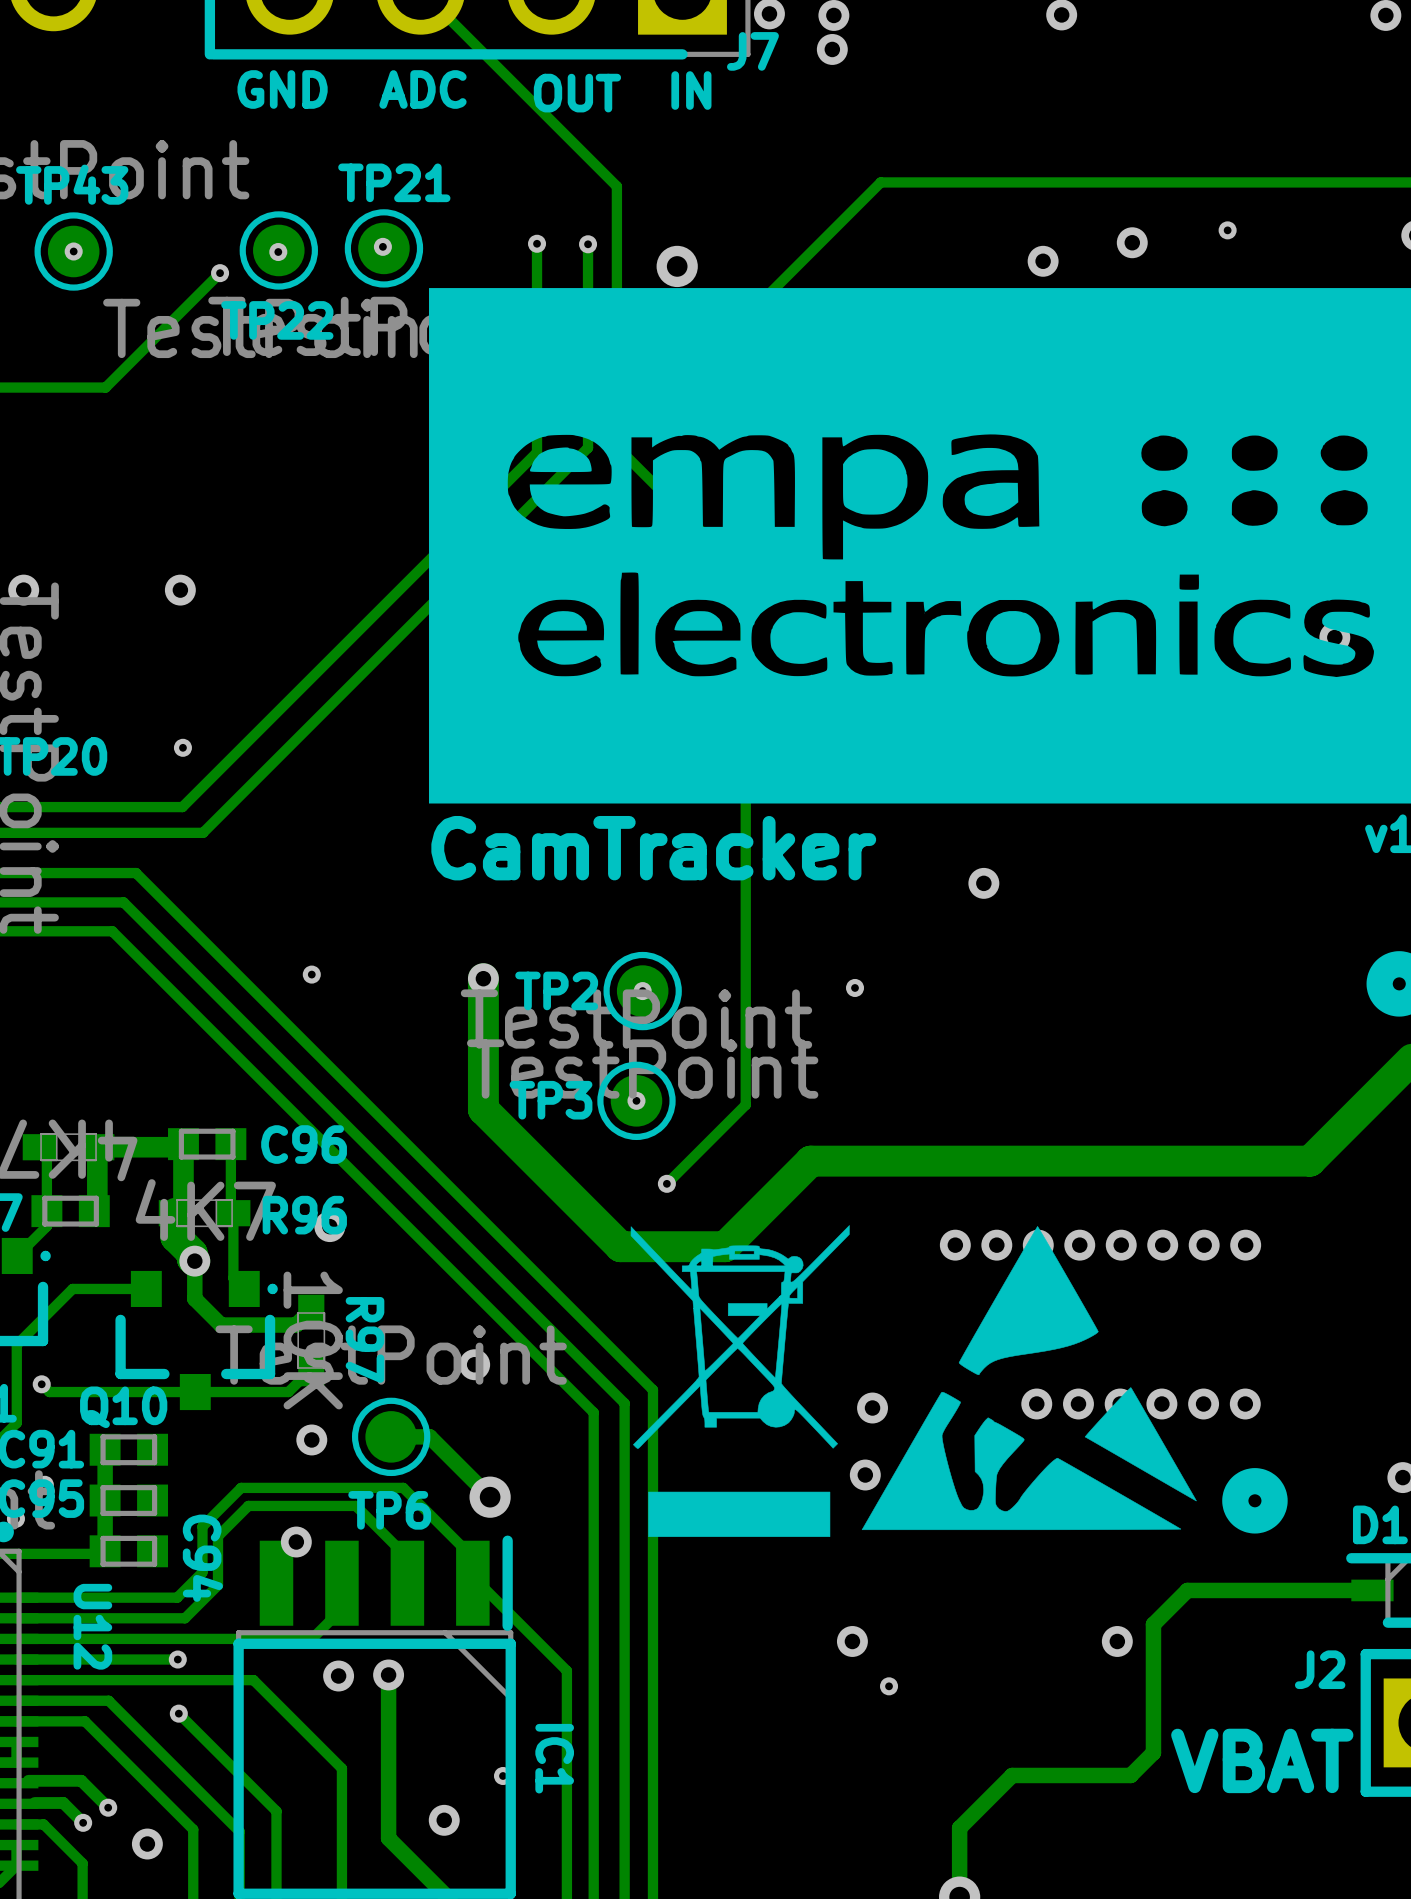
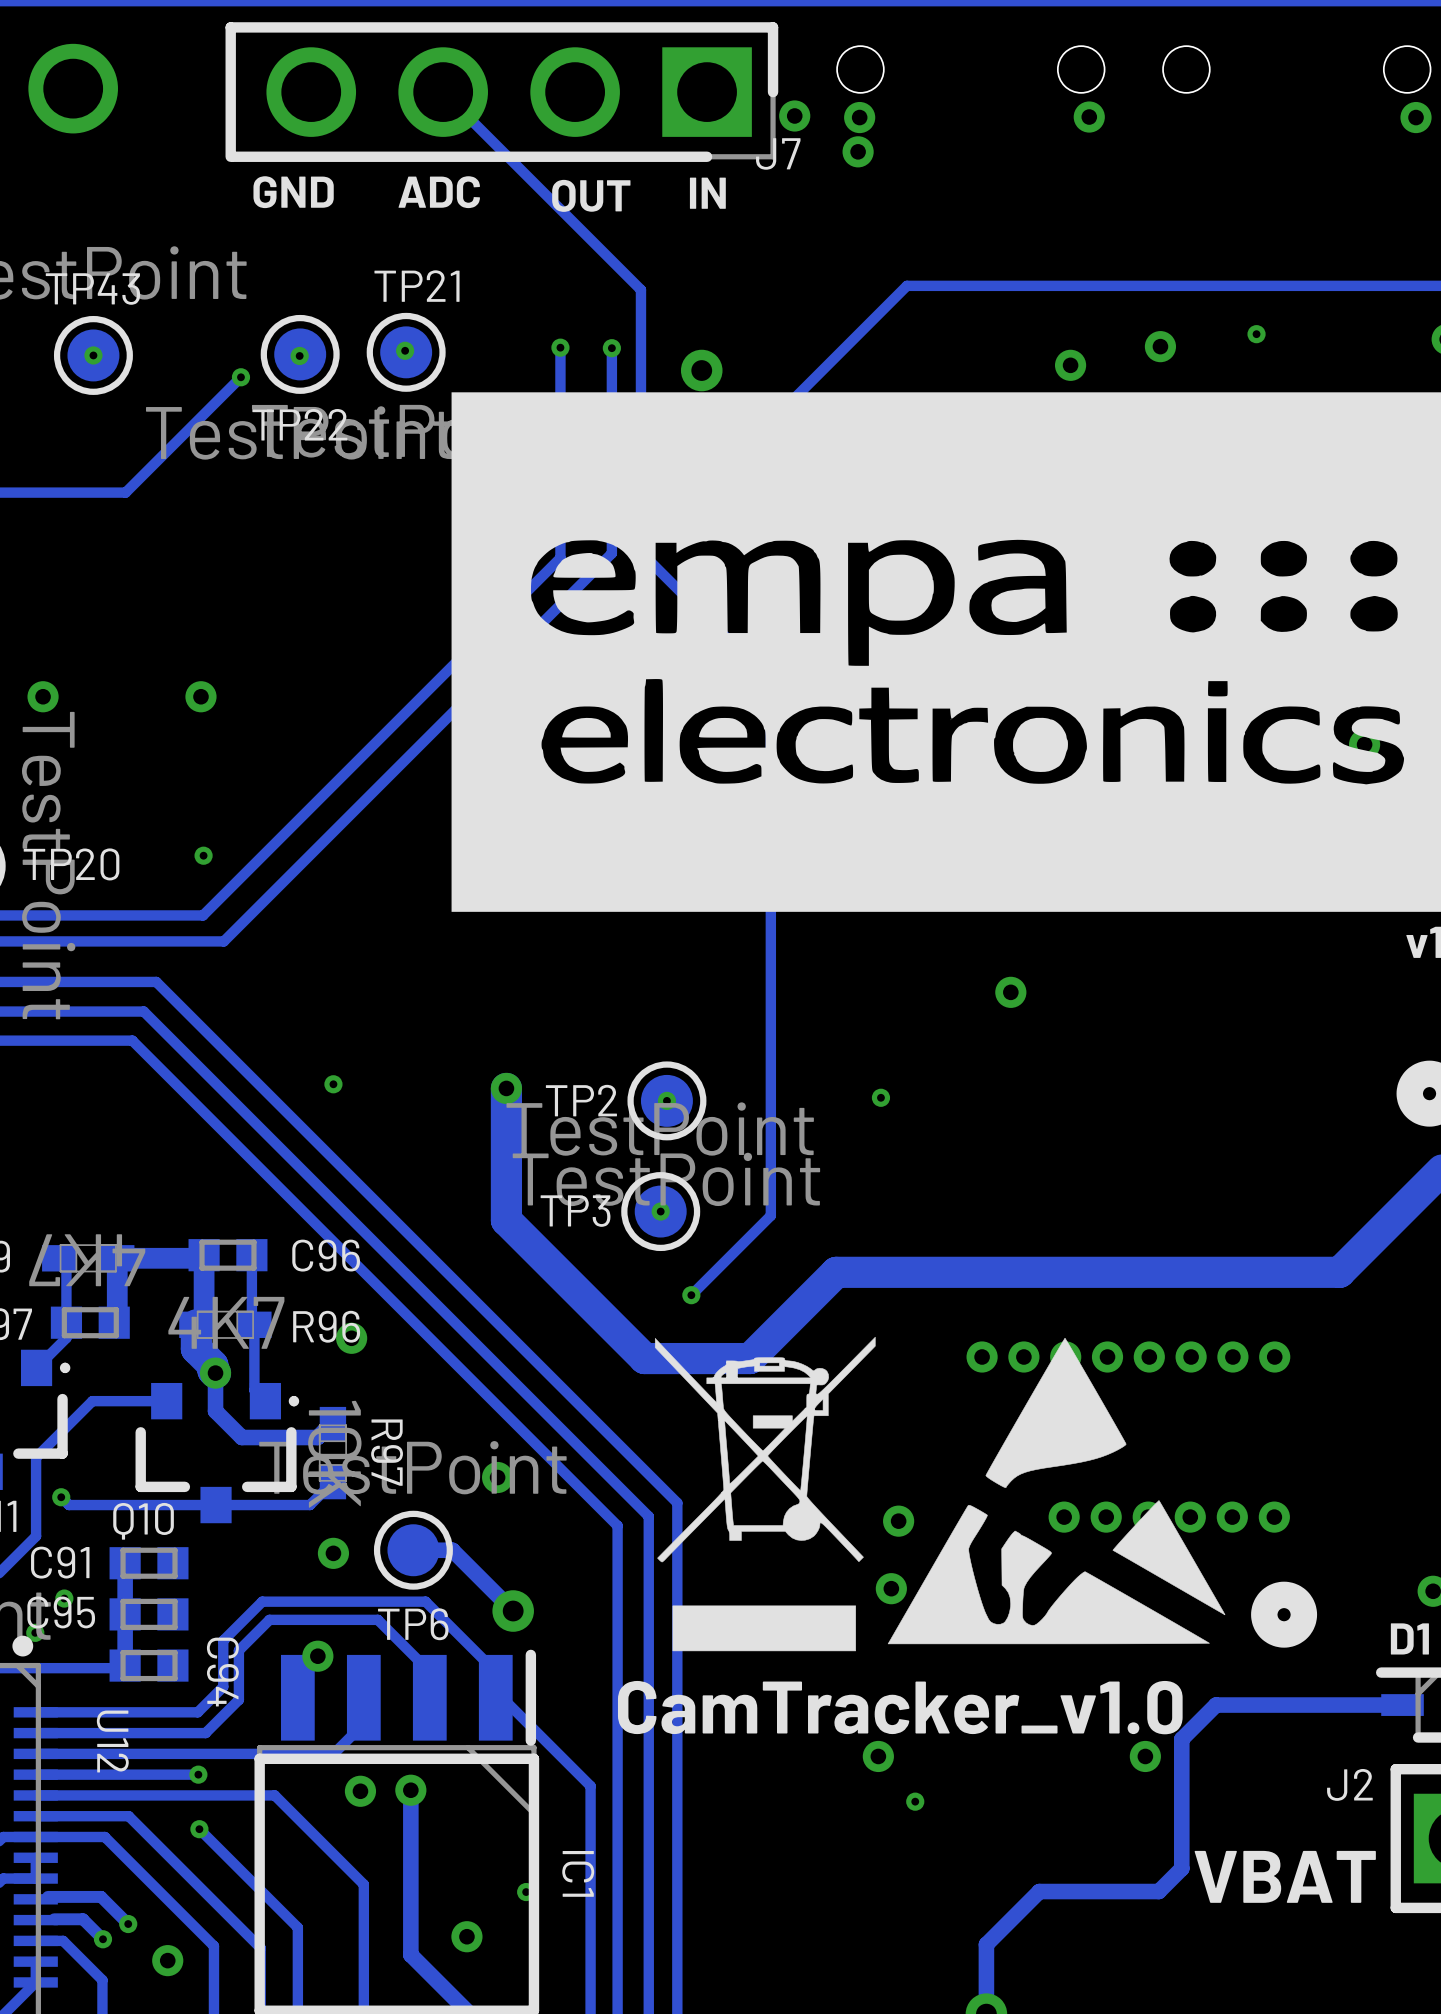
text: CamTracker (653, 848) -> none
text: none -> CamTracker_v1.0 (900, 1707)

